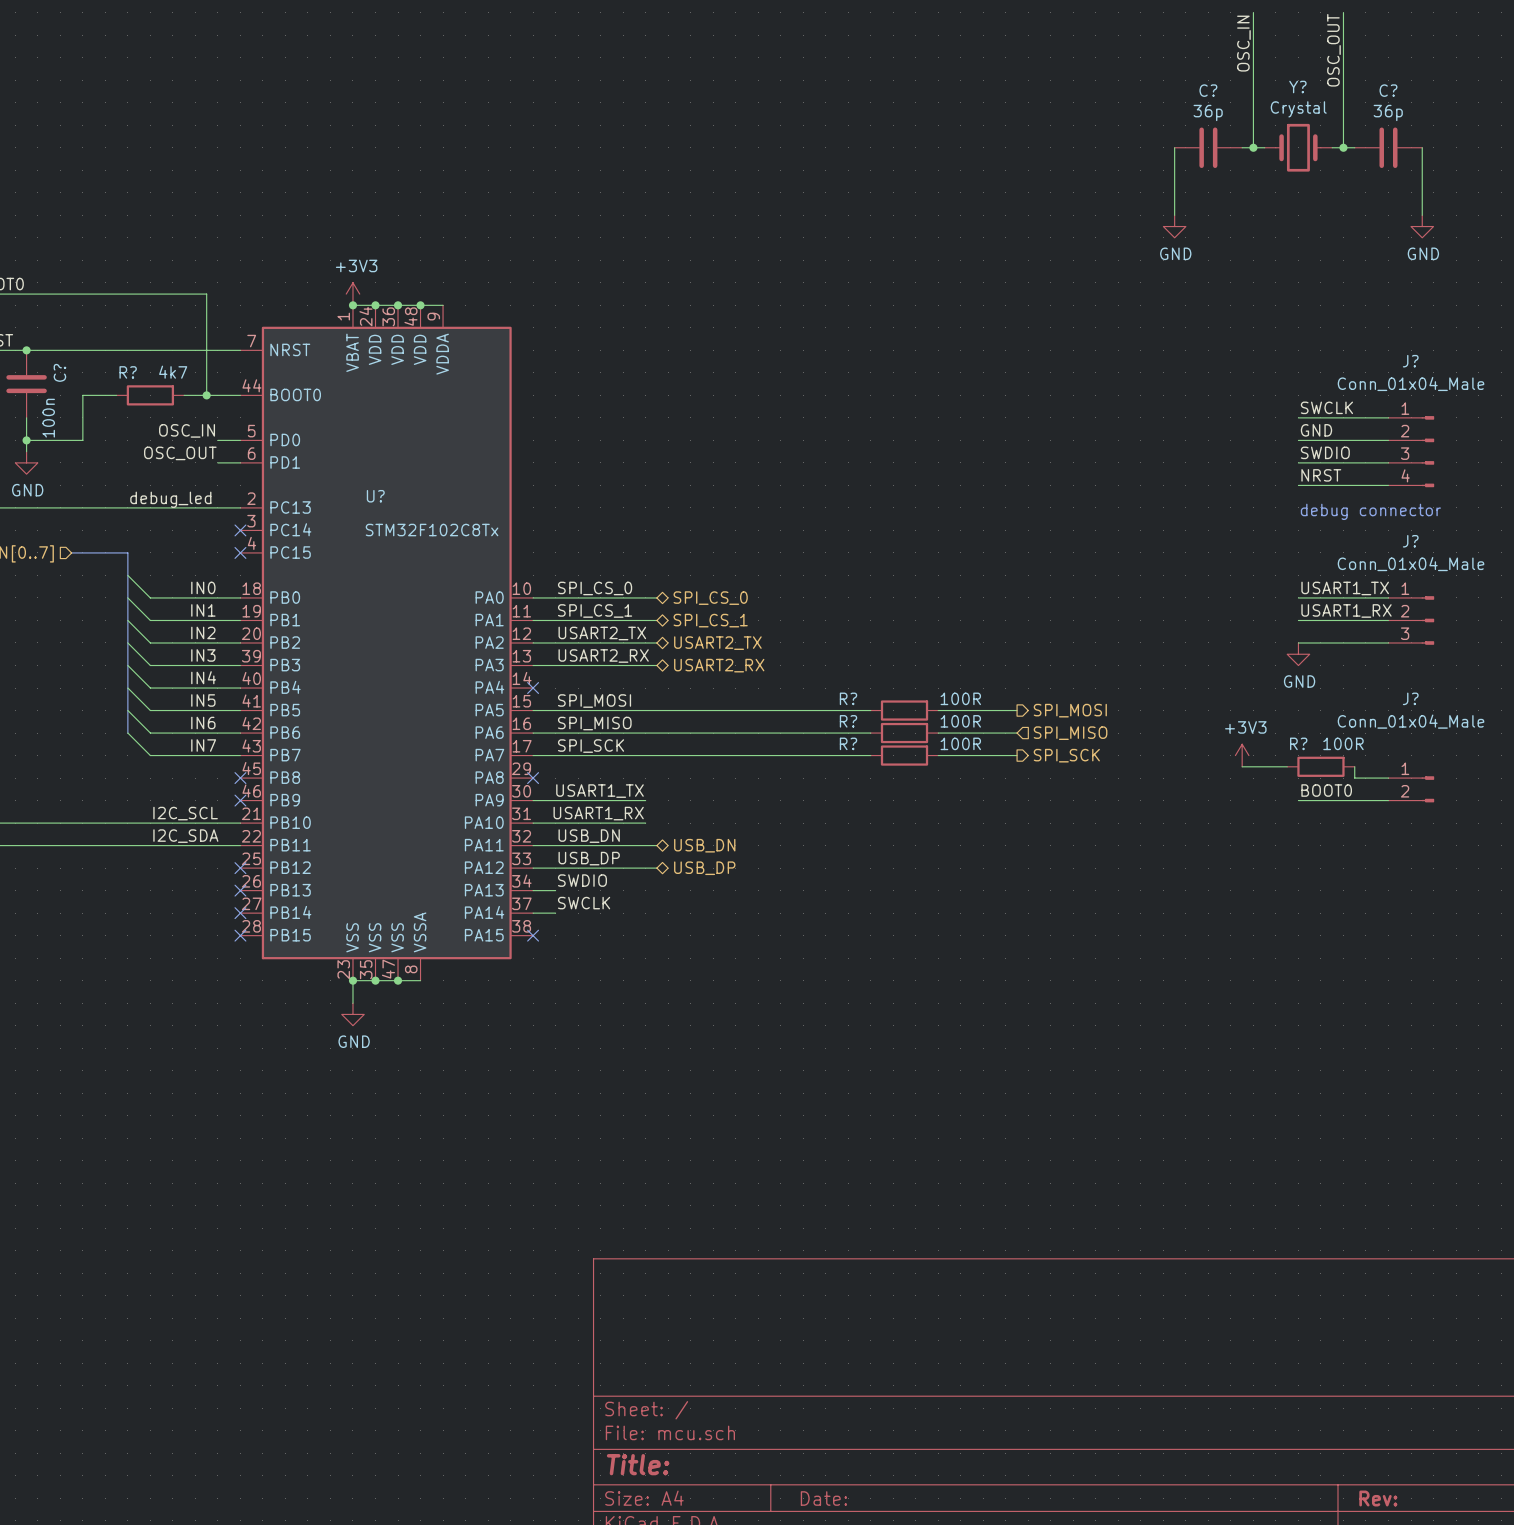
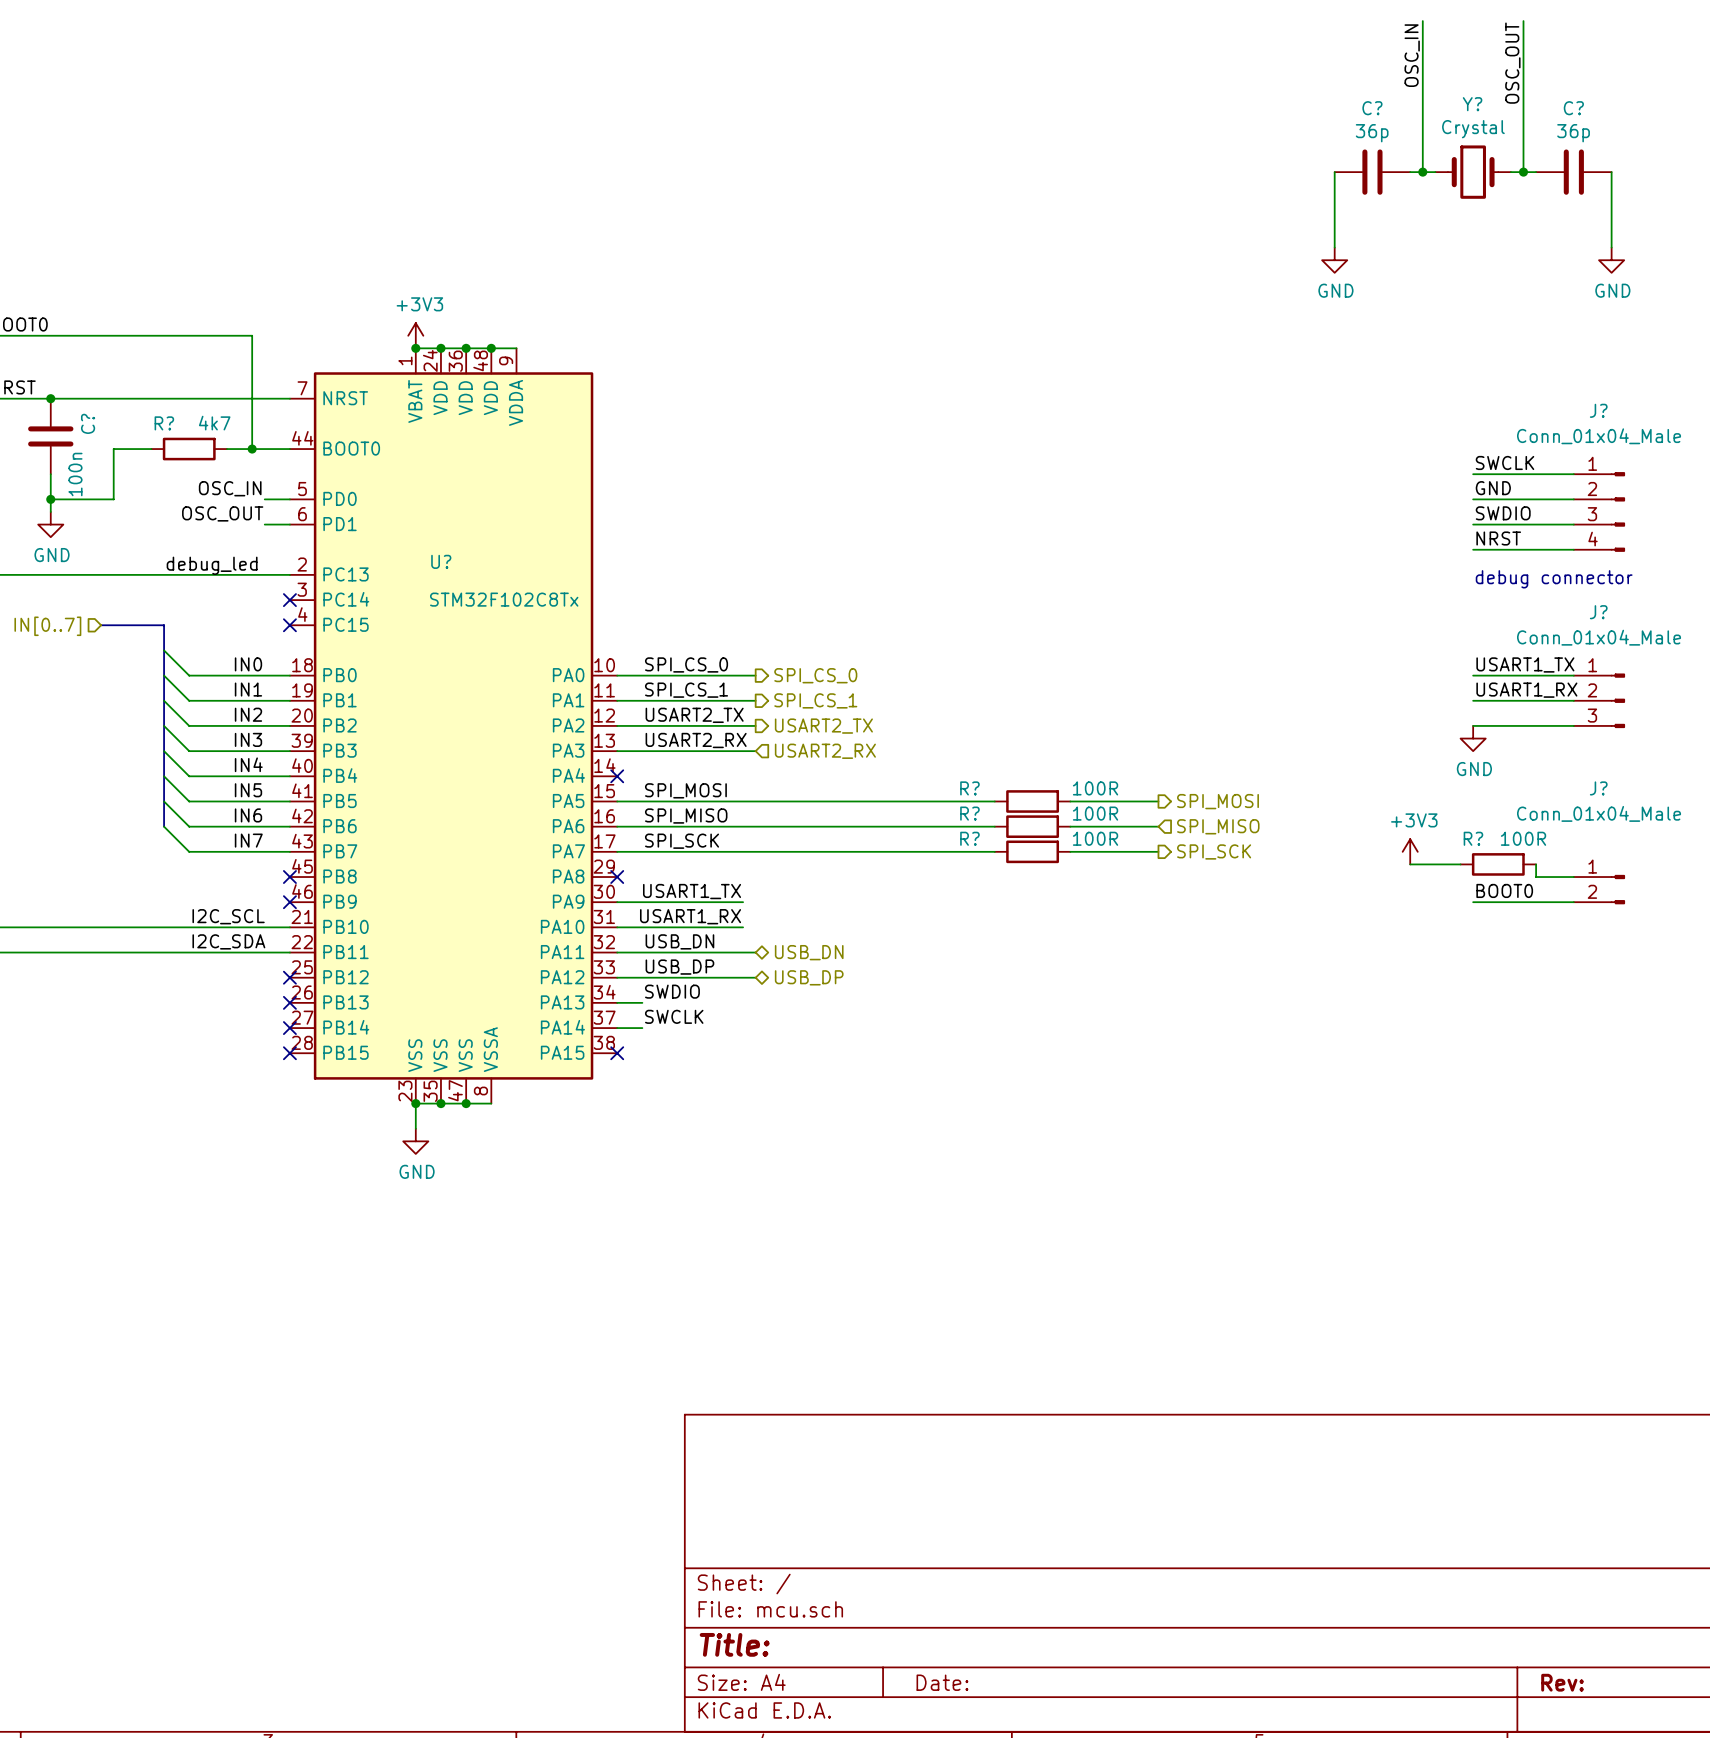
hierarchical label shape: bidirectional (710, 598) -> output (815, 675)
hierarchical label shape: bidirectional (710, 620) -> output (815, 700)
hierarchical label shape: bidirectional (717, 643) -> output (823, 726)
hierarchical label shape: bidirectional (719, 665) -> input (825, 751)

